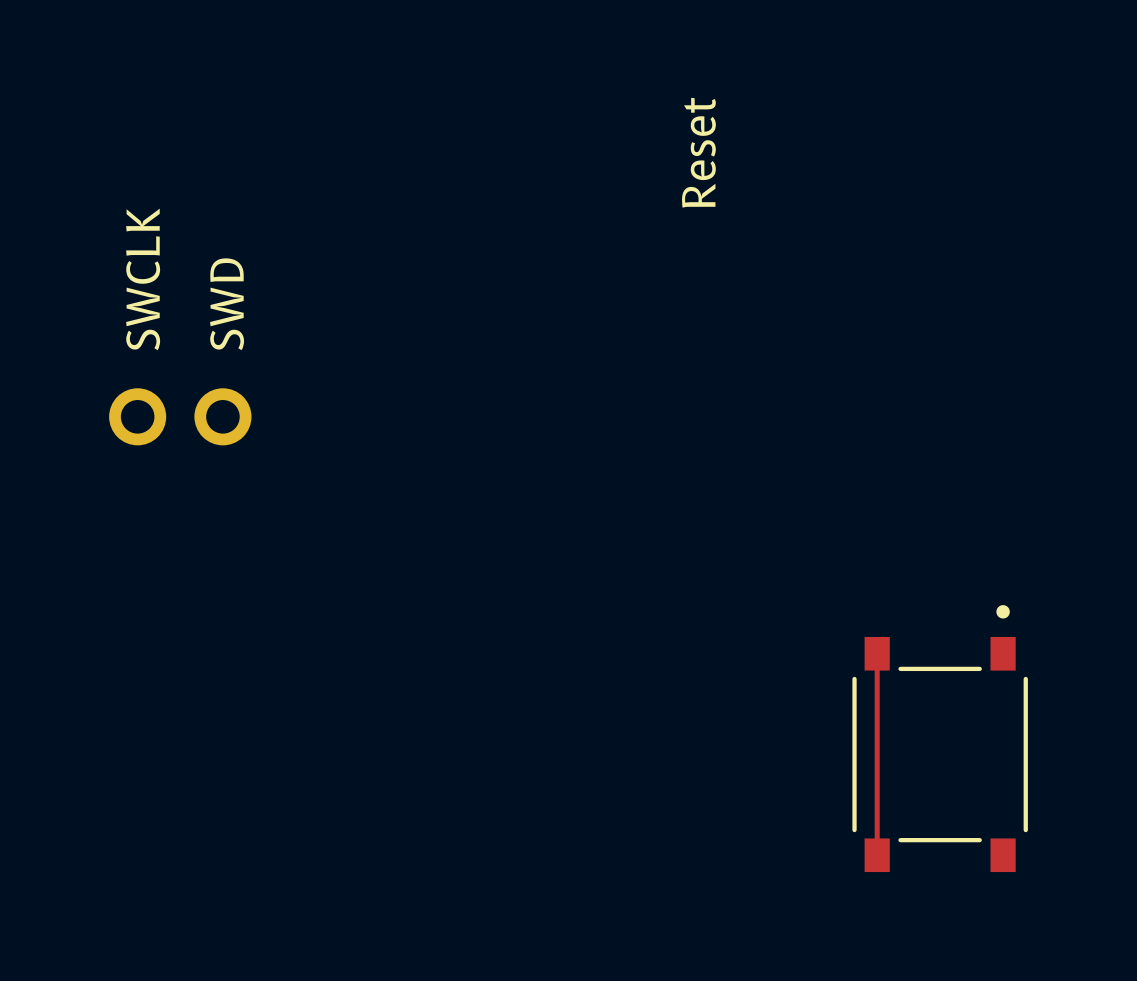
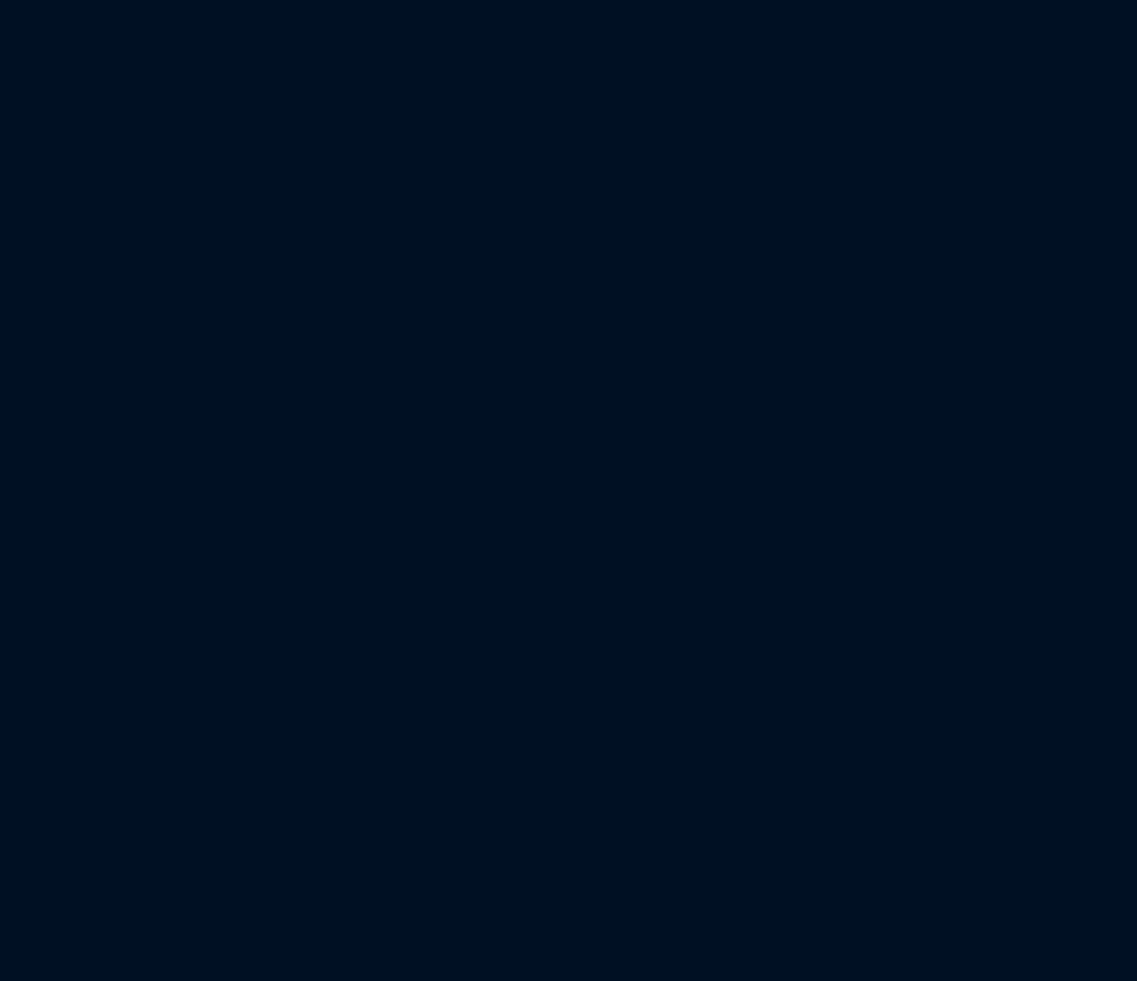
text: Reset (698, 152) -> none
text: SWCLK (143, 279) -> none
text: SWD (227, 304) -> none
part: (180, 416) -> none
top track: (877, 649) (877, 850) -> none
part: (940, 738) -> none

